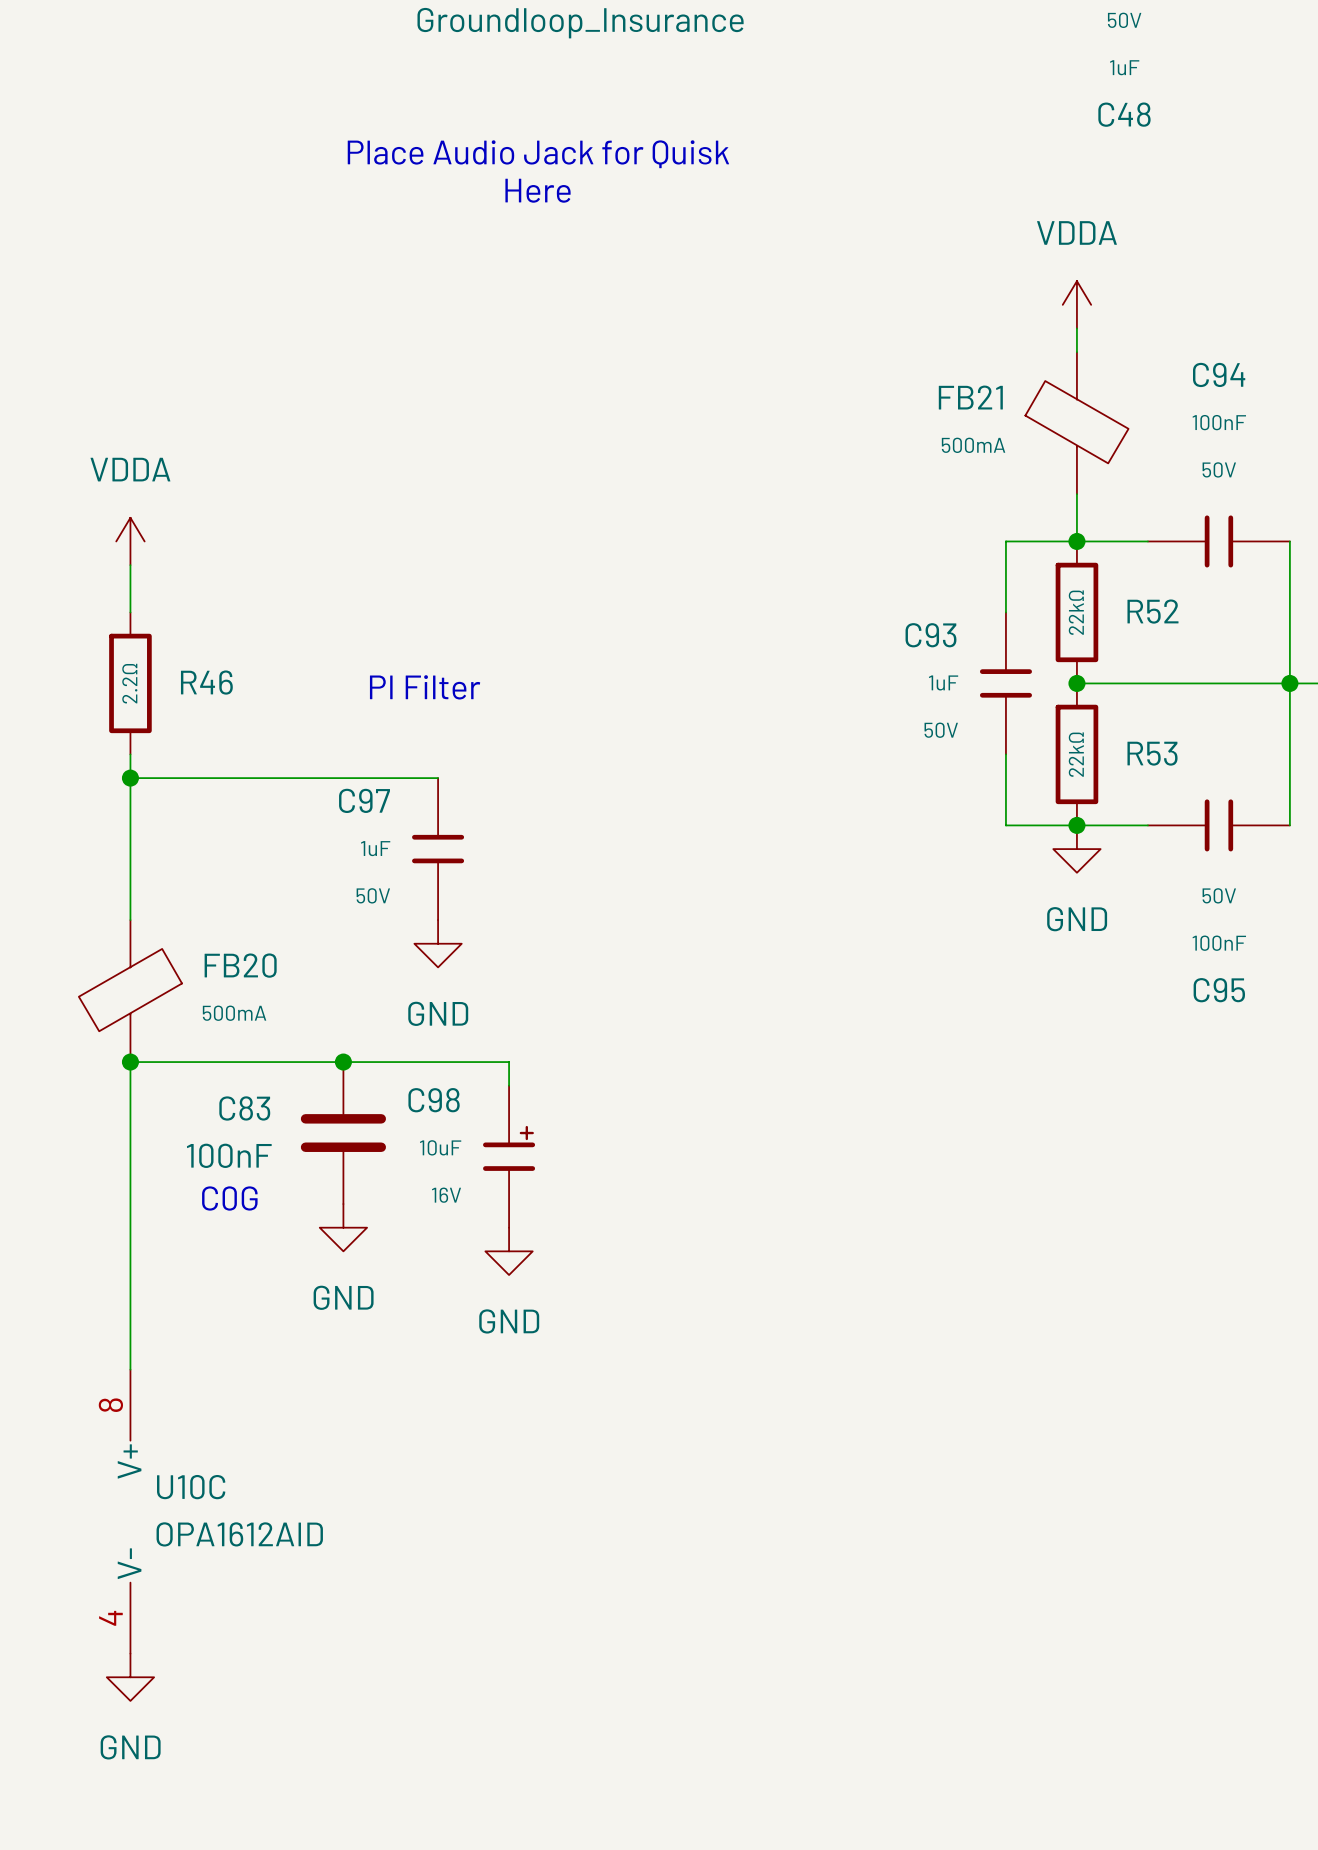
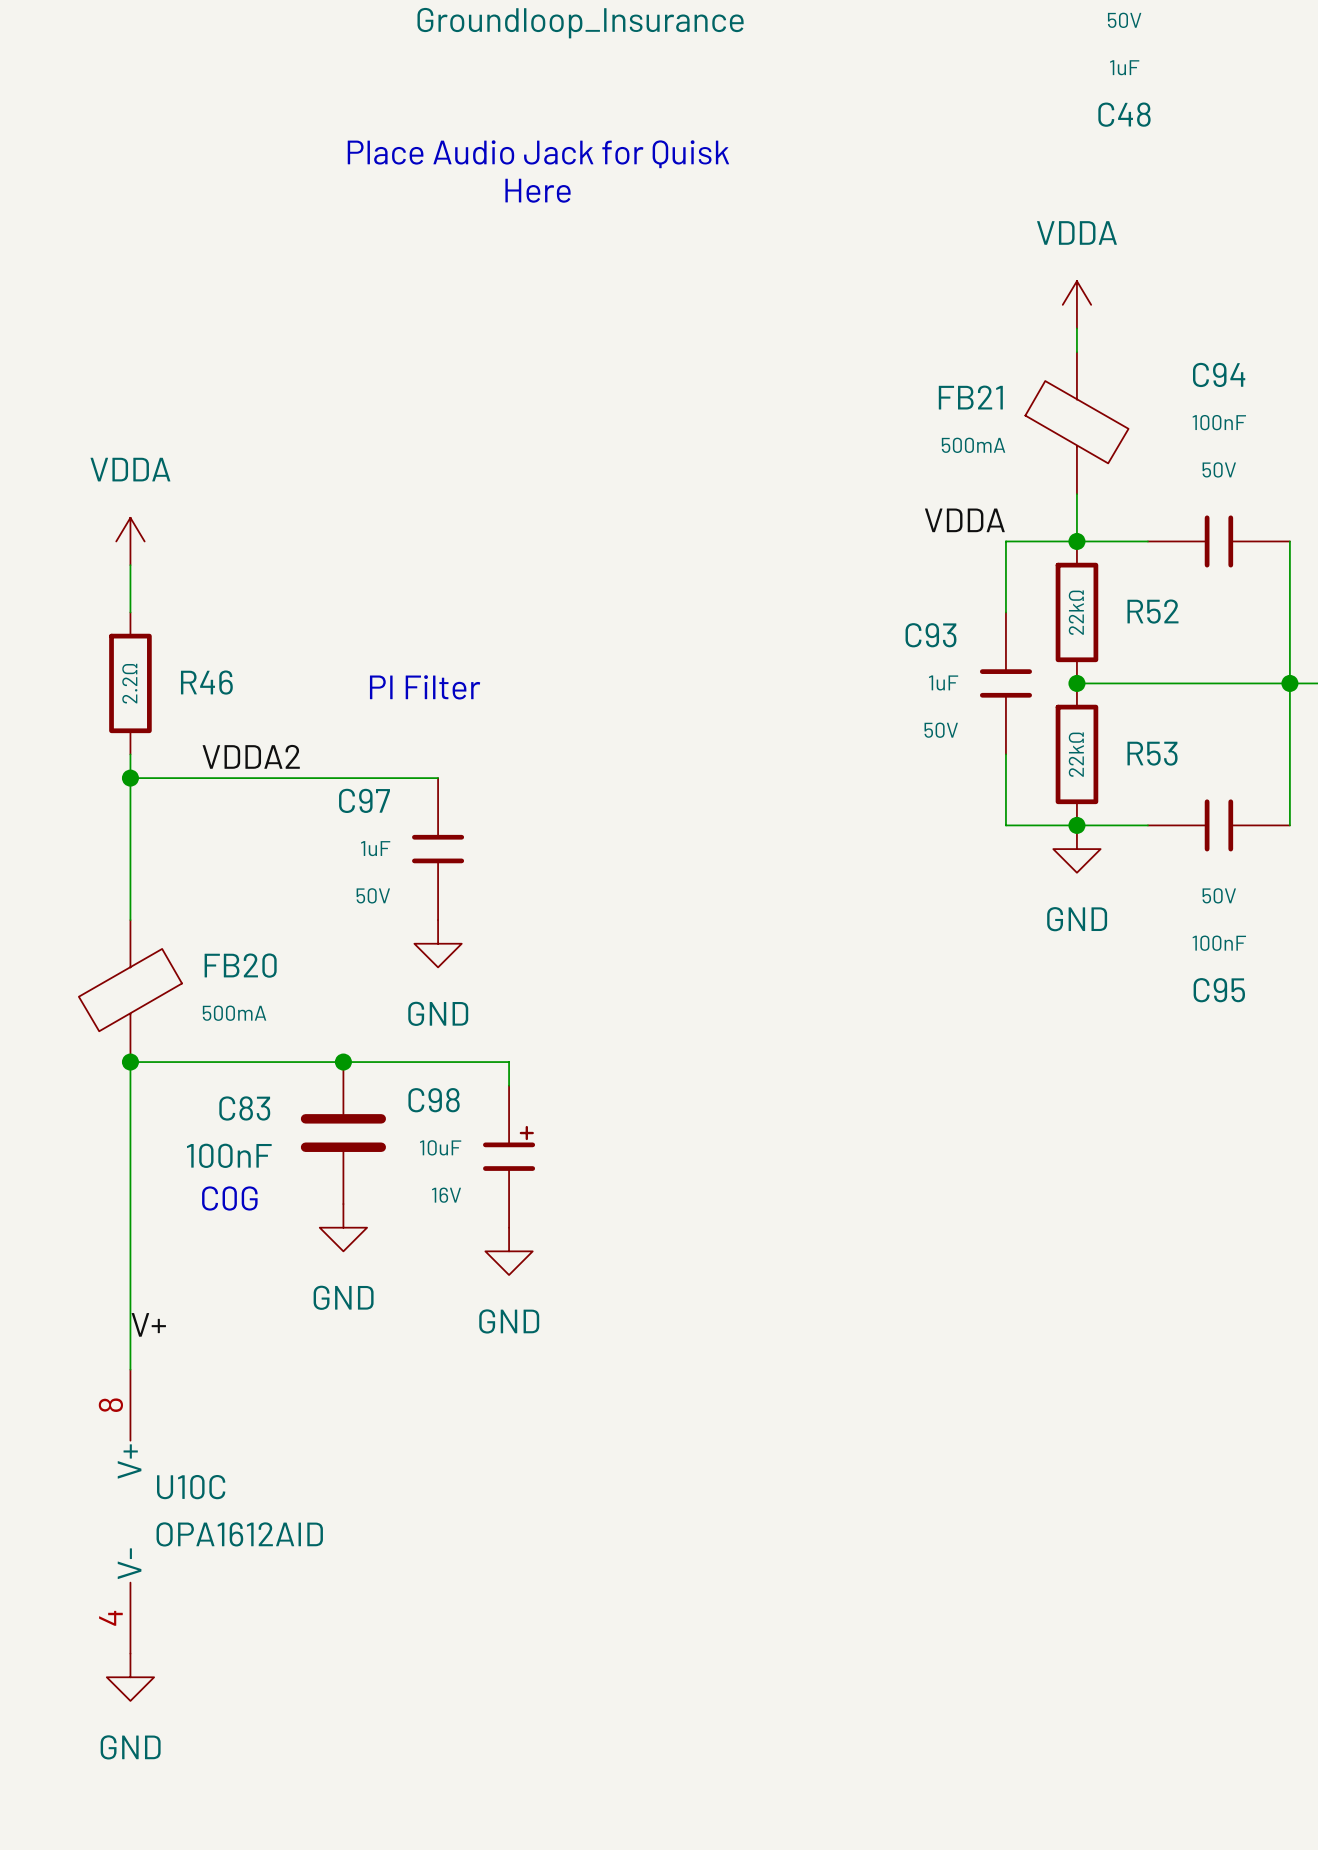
label: none -> VDDA (964, 520)
label: none -> VDDA2 (251, 756)
label: none -> V+ (148, 1324)

